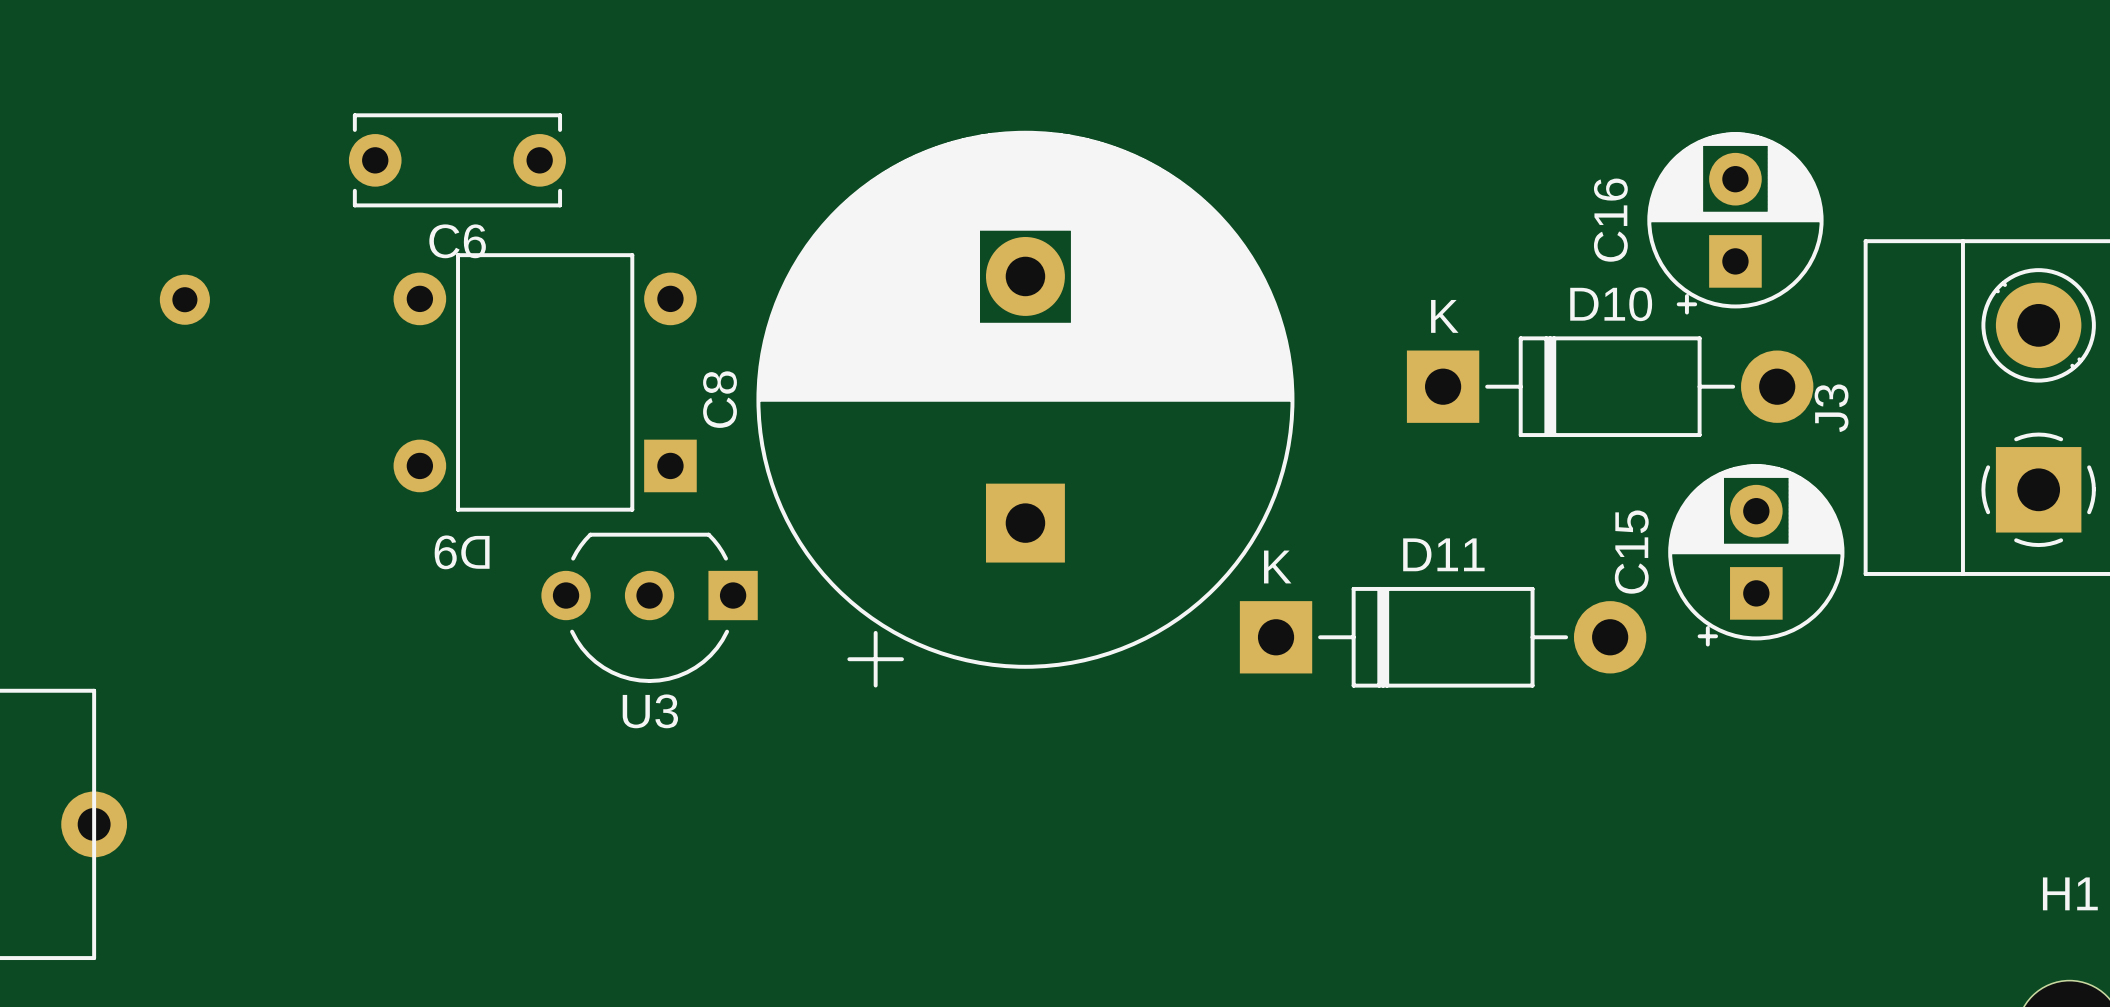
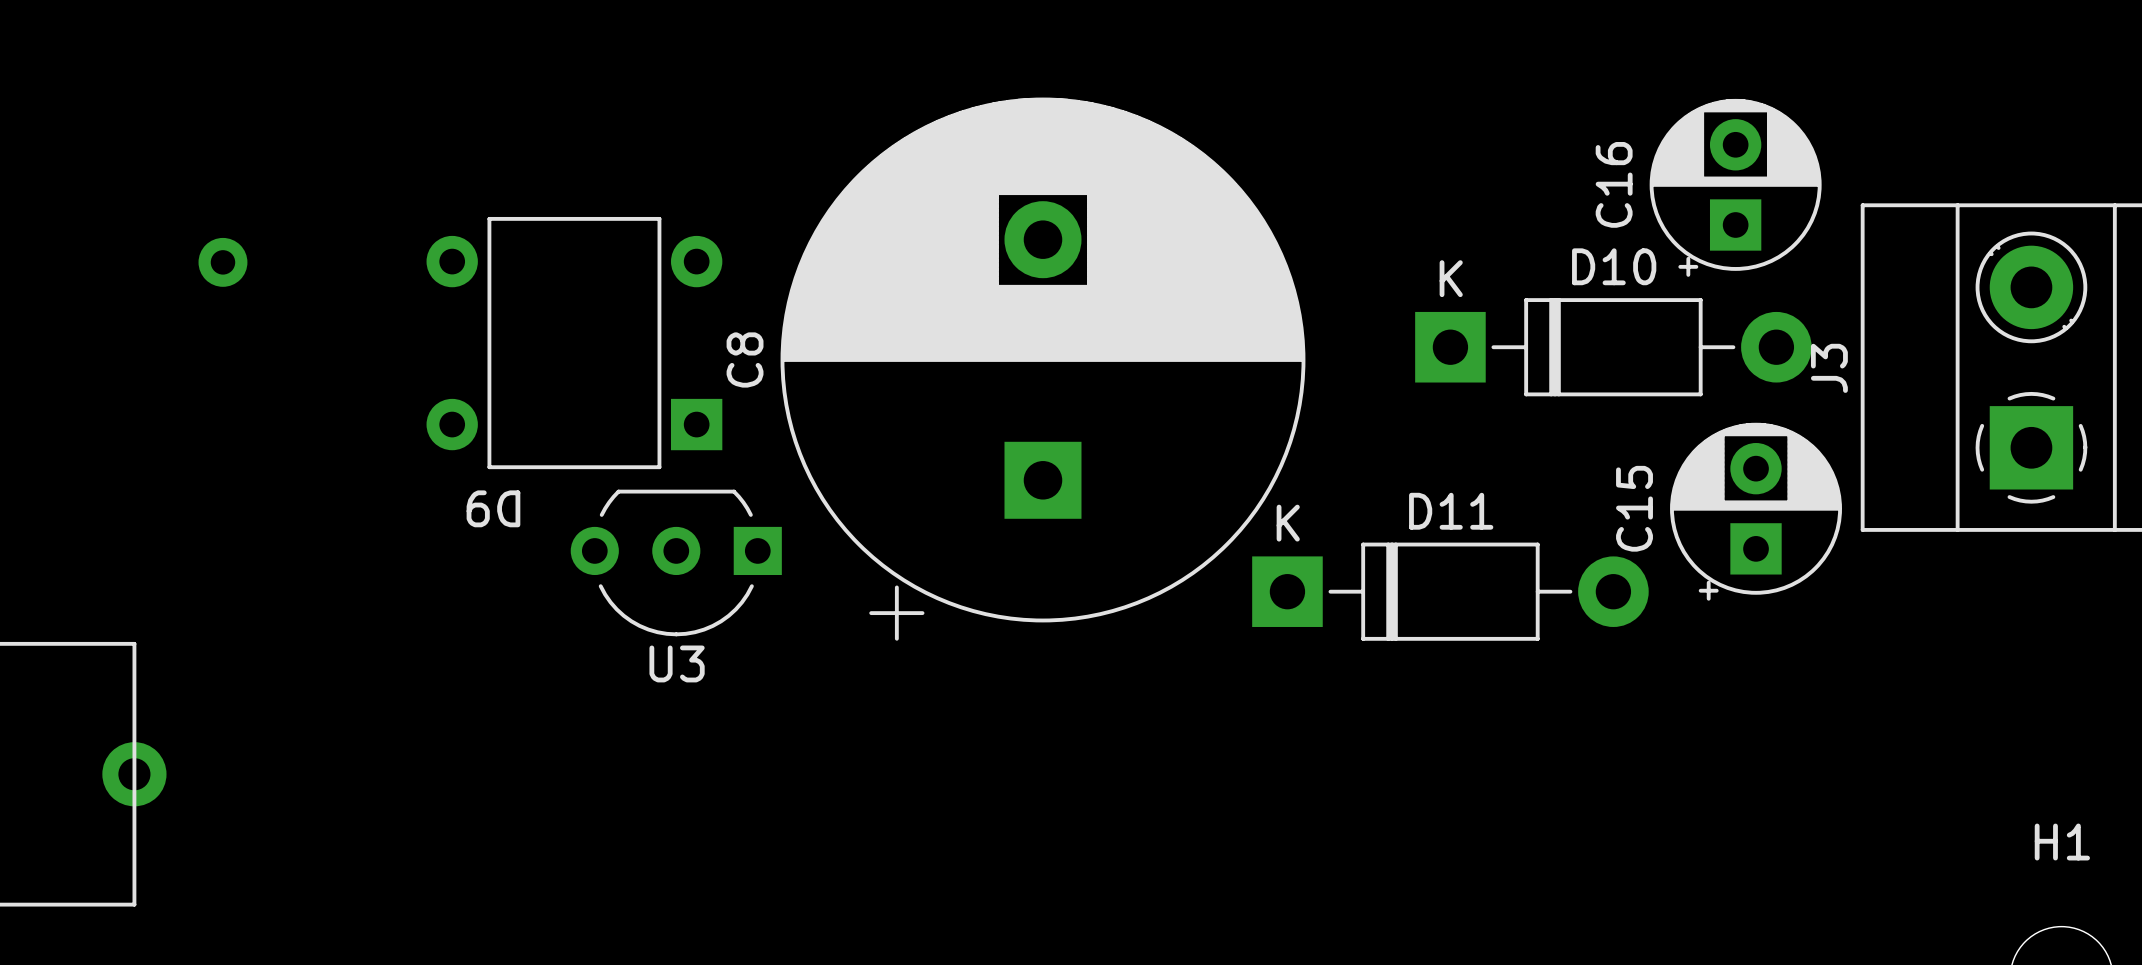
C6: (457, 160) -> none

